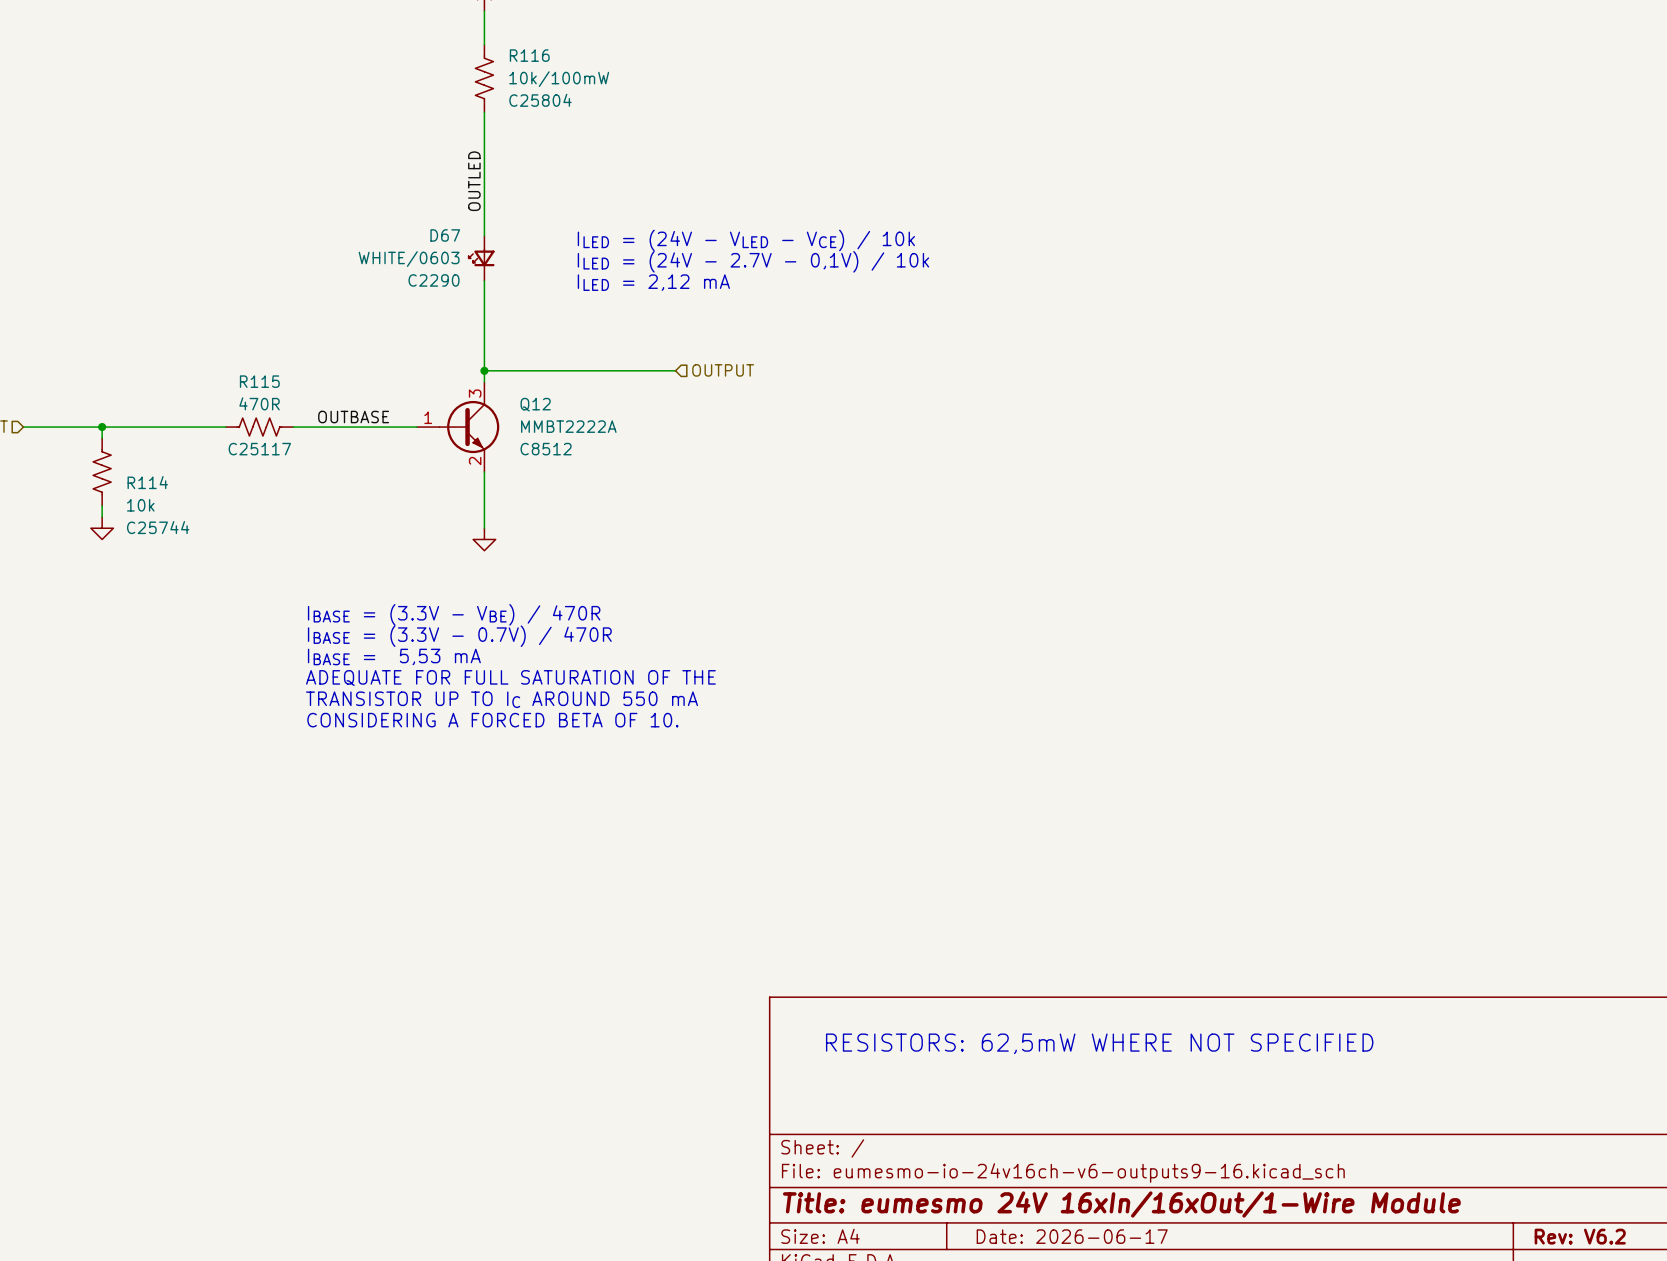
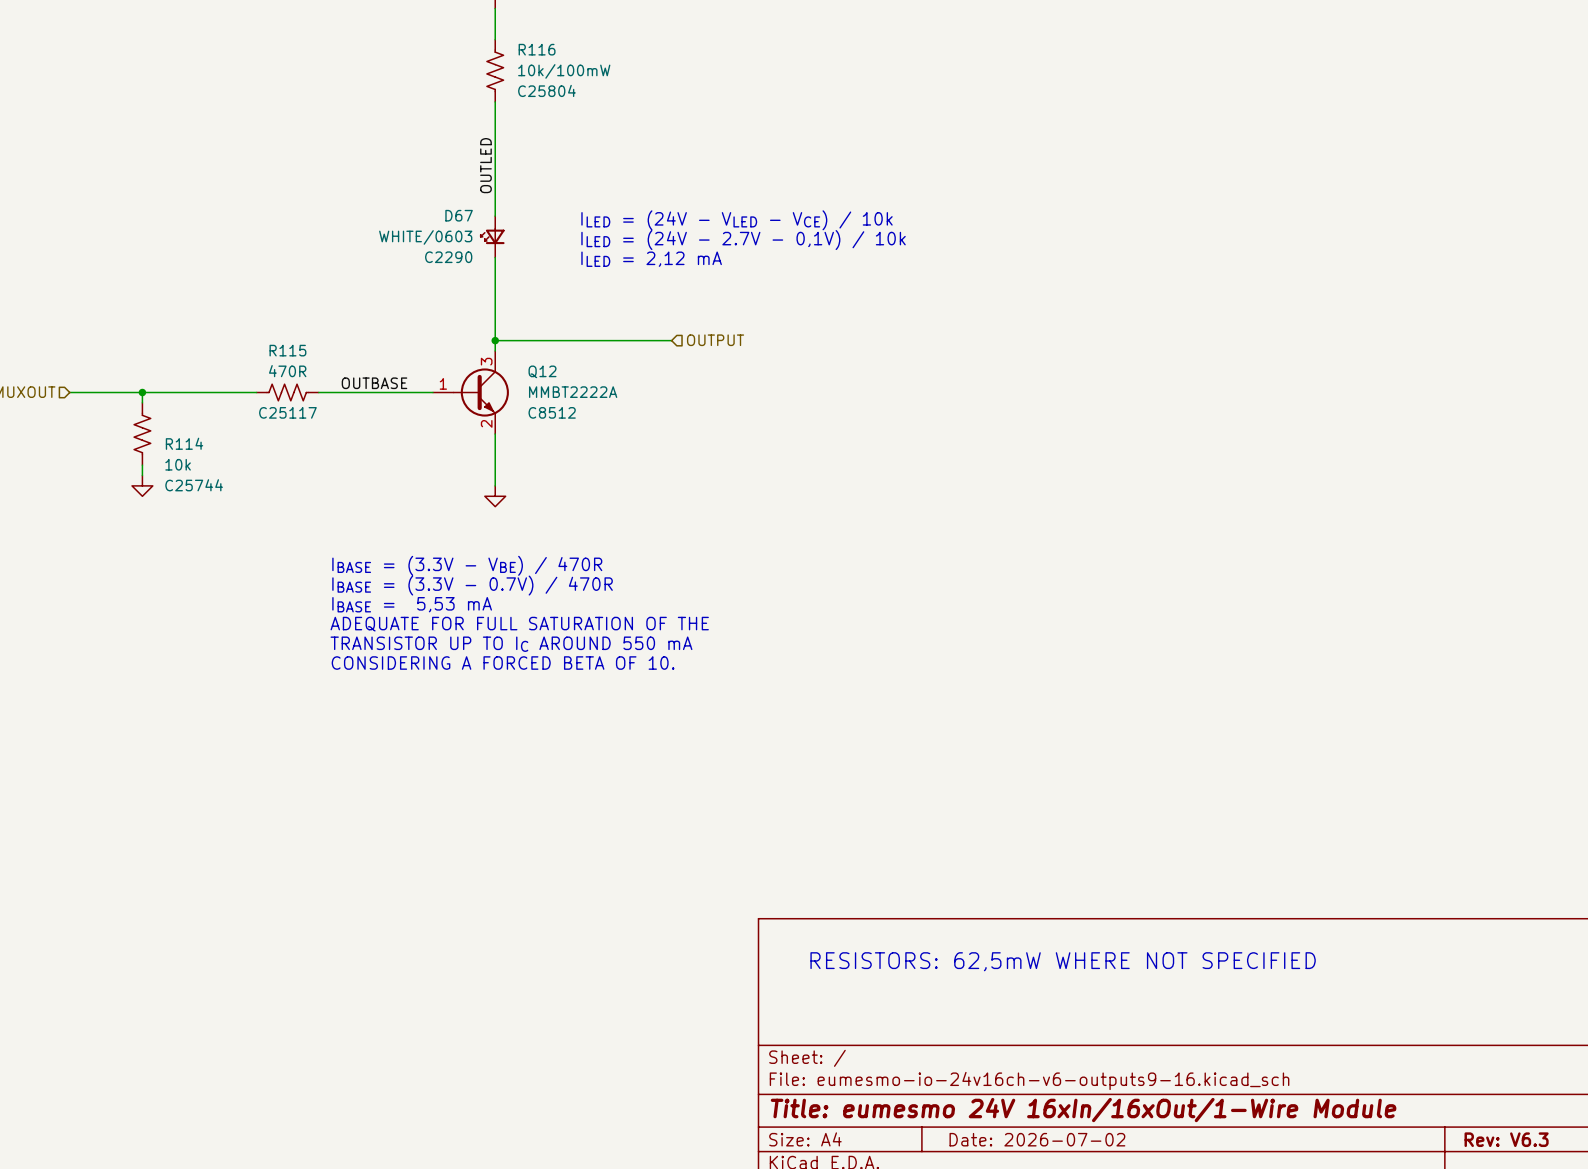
title block: Date: 2026-06-17 (1072, 1236) -> Date: 2026-07-02 (1037, 1139)
title block: Rev: V6.2 (1580, 1236) -> Rev: V6.3 (1506, 1139)

